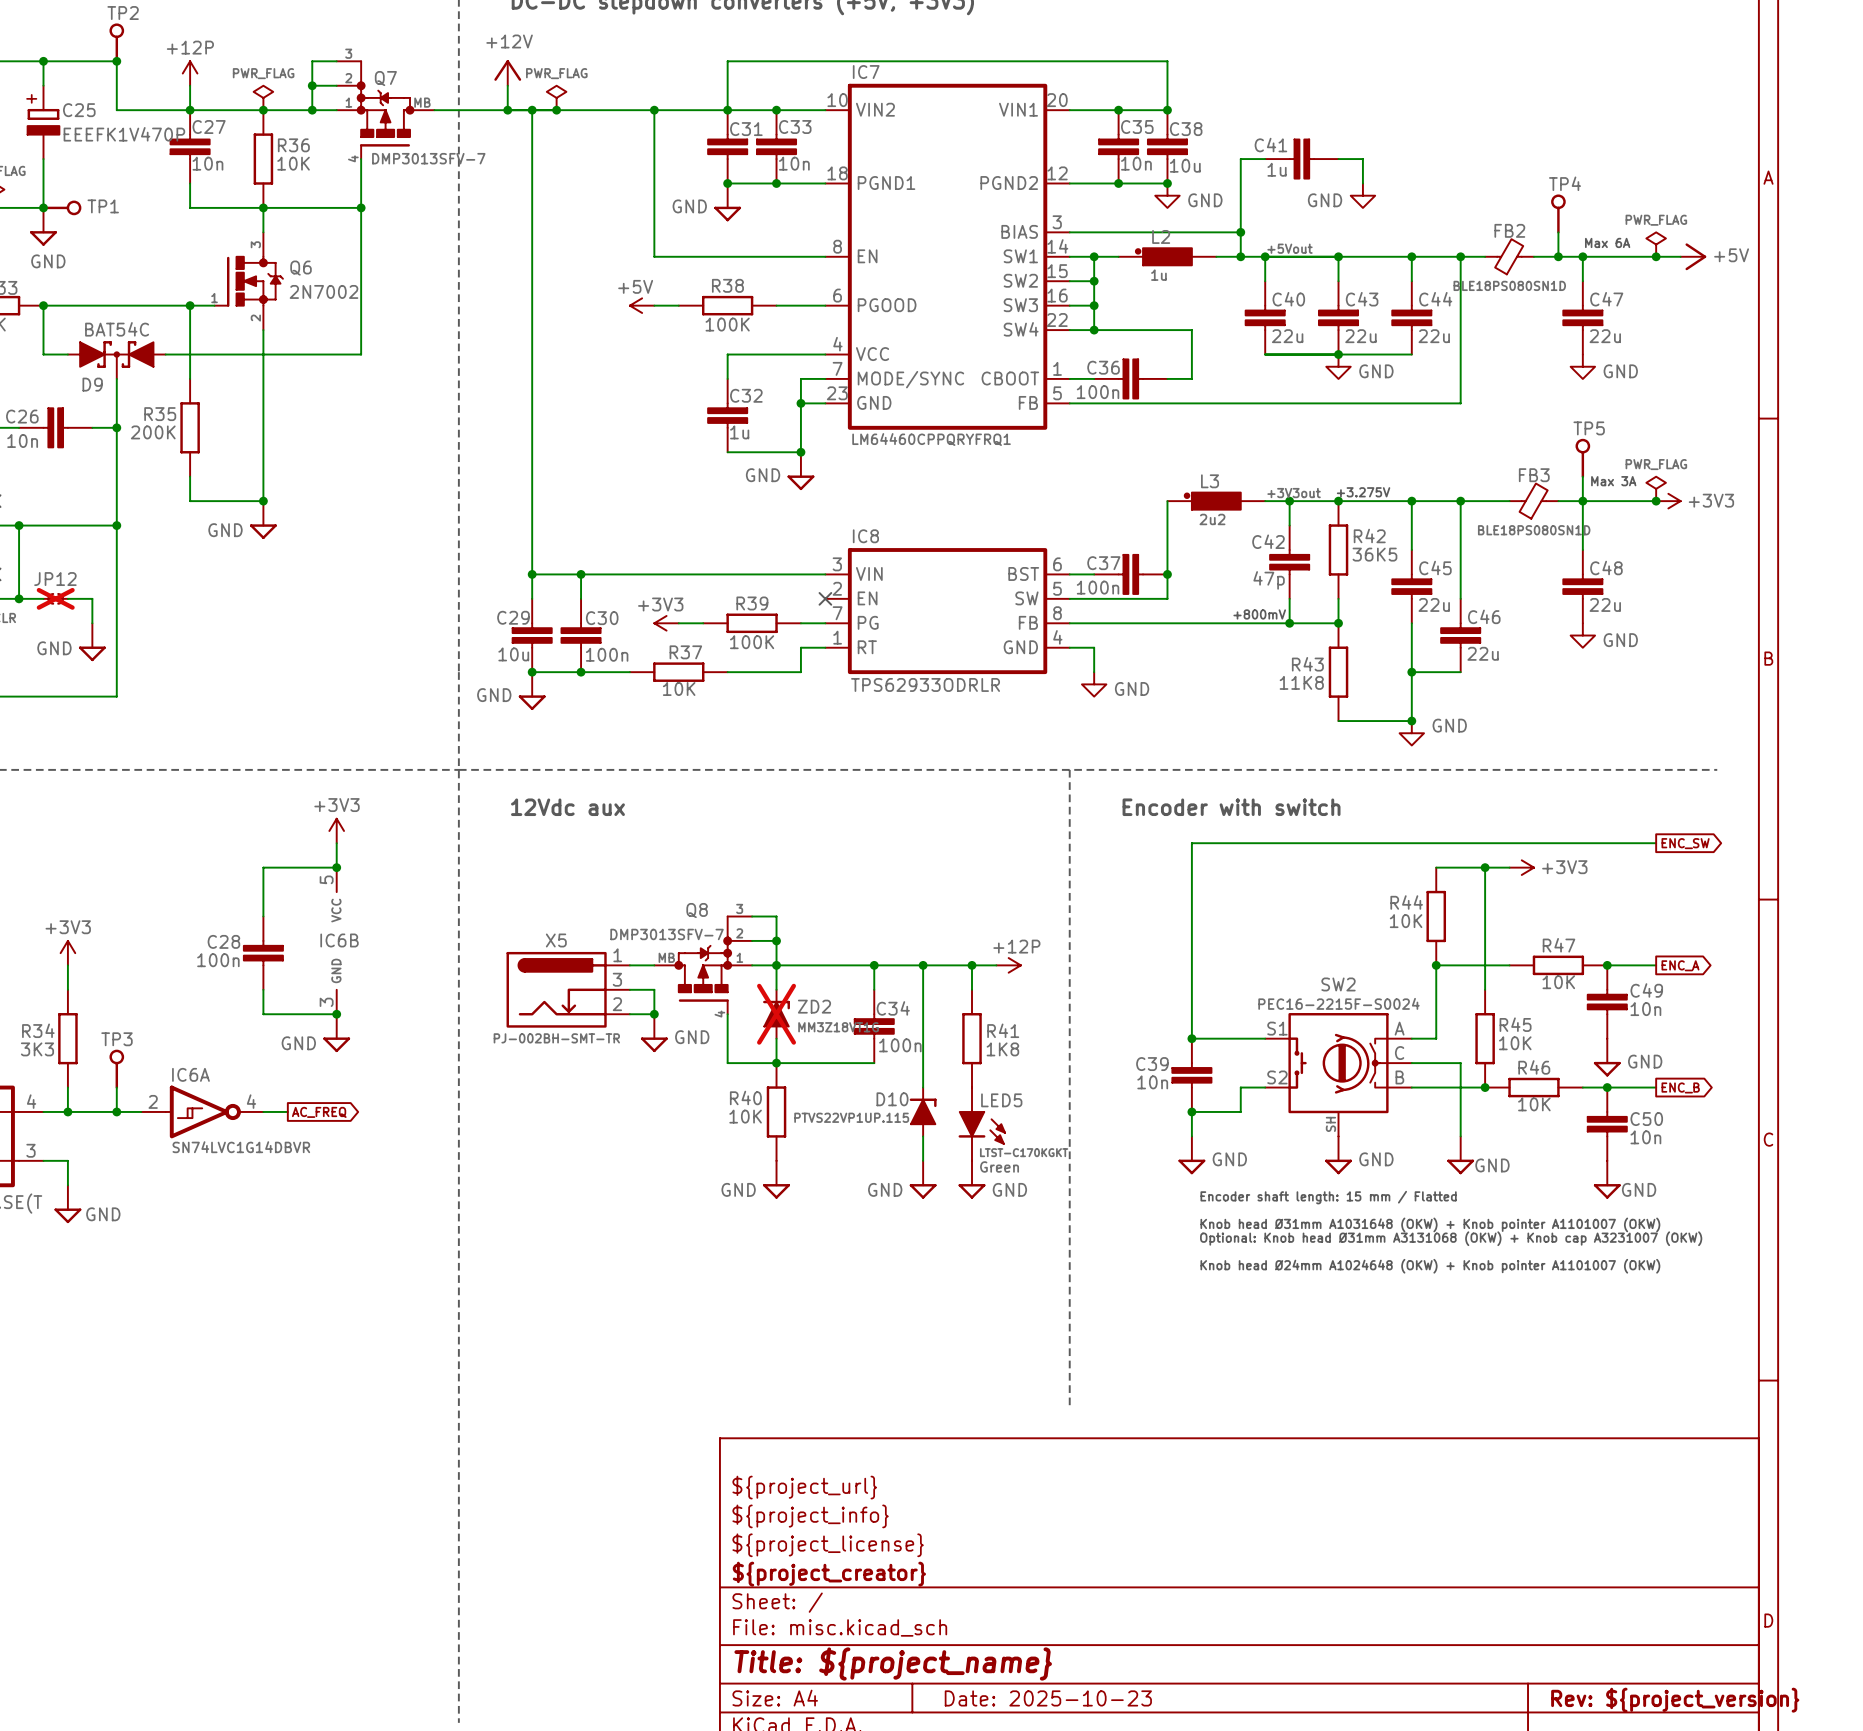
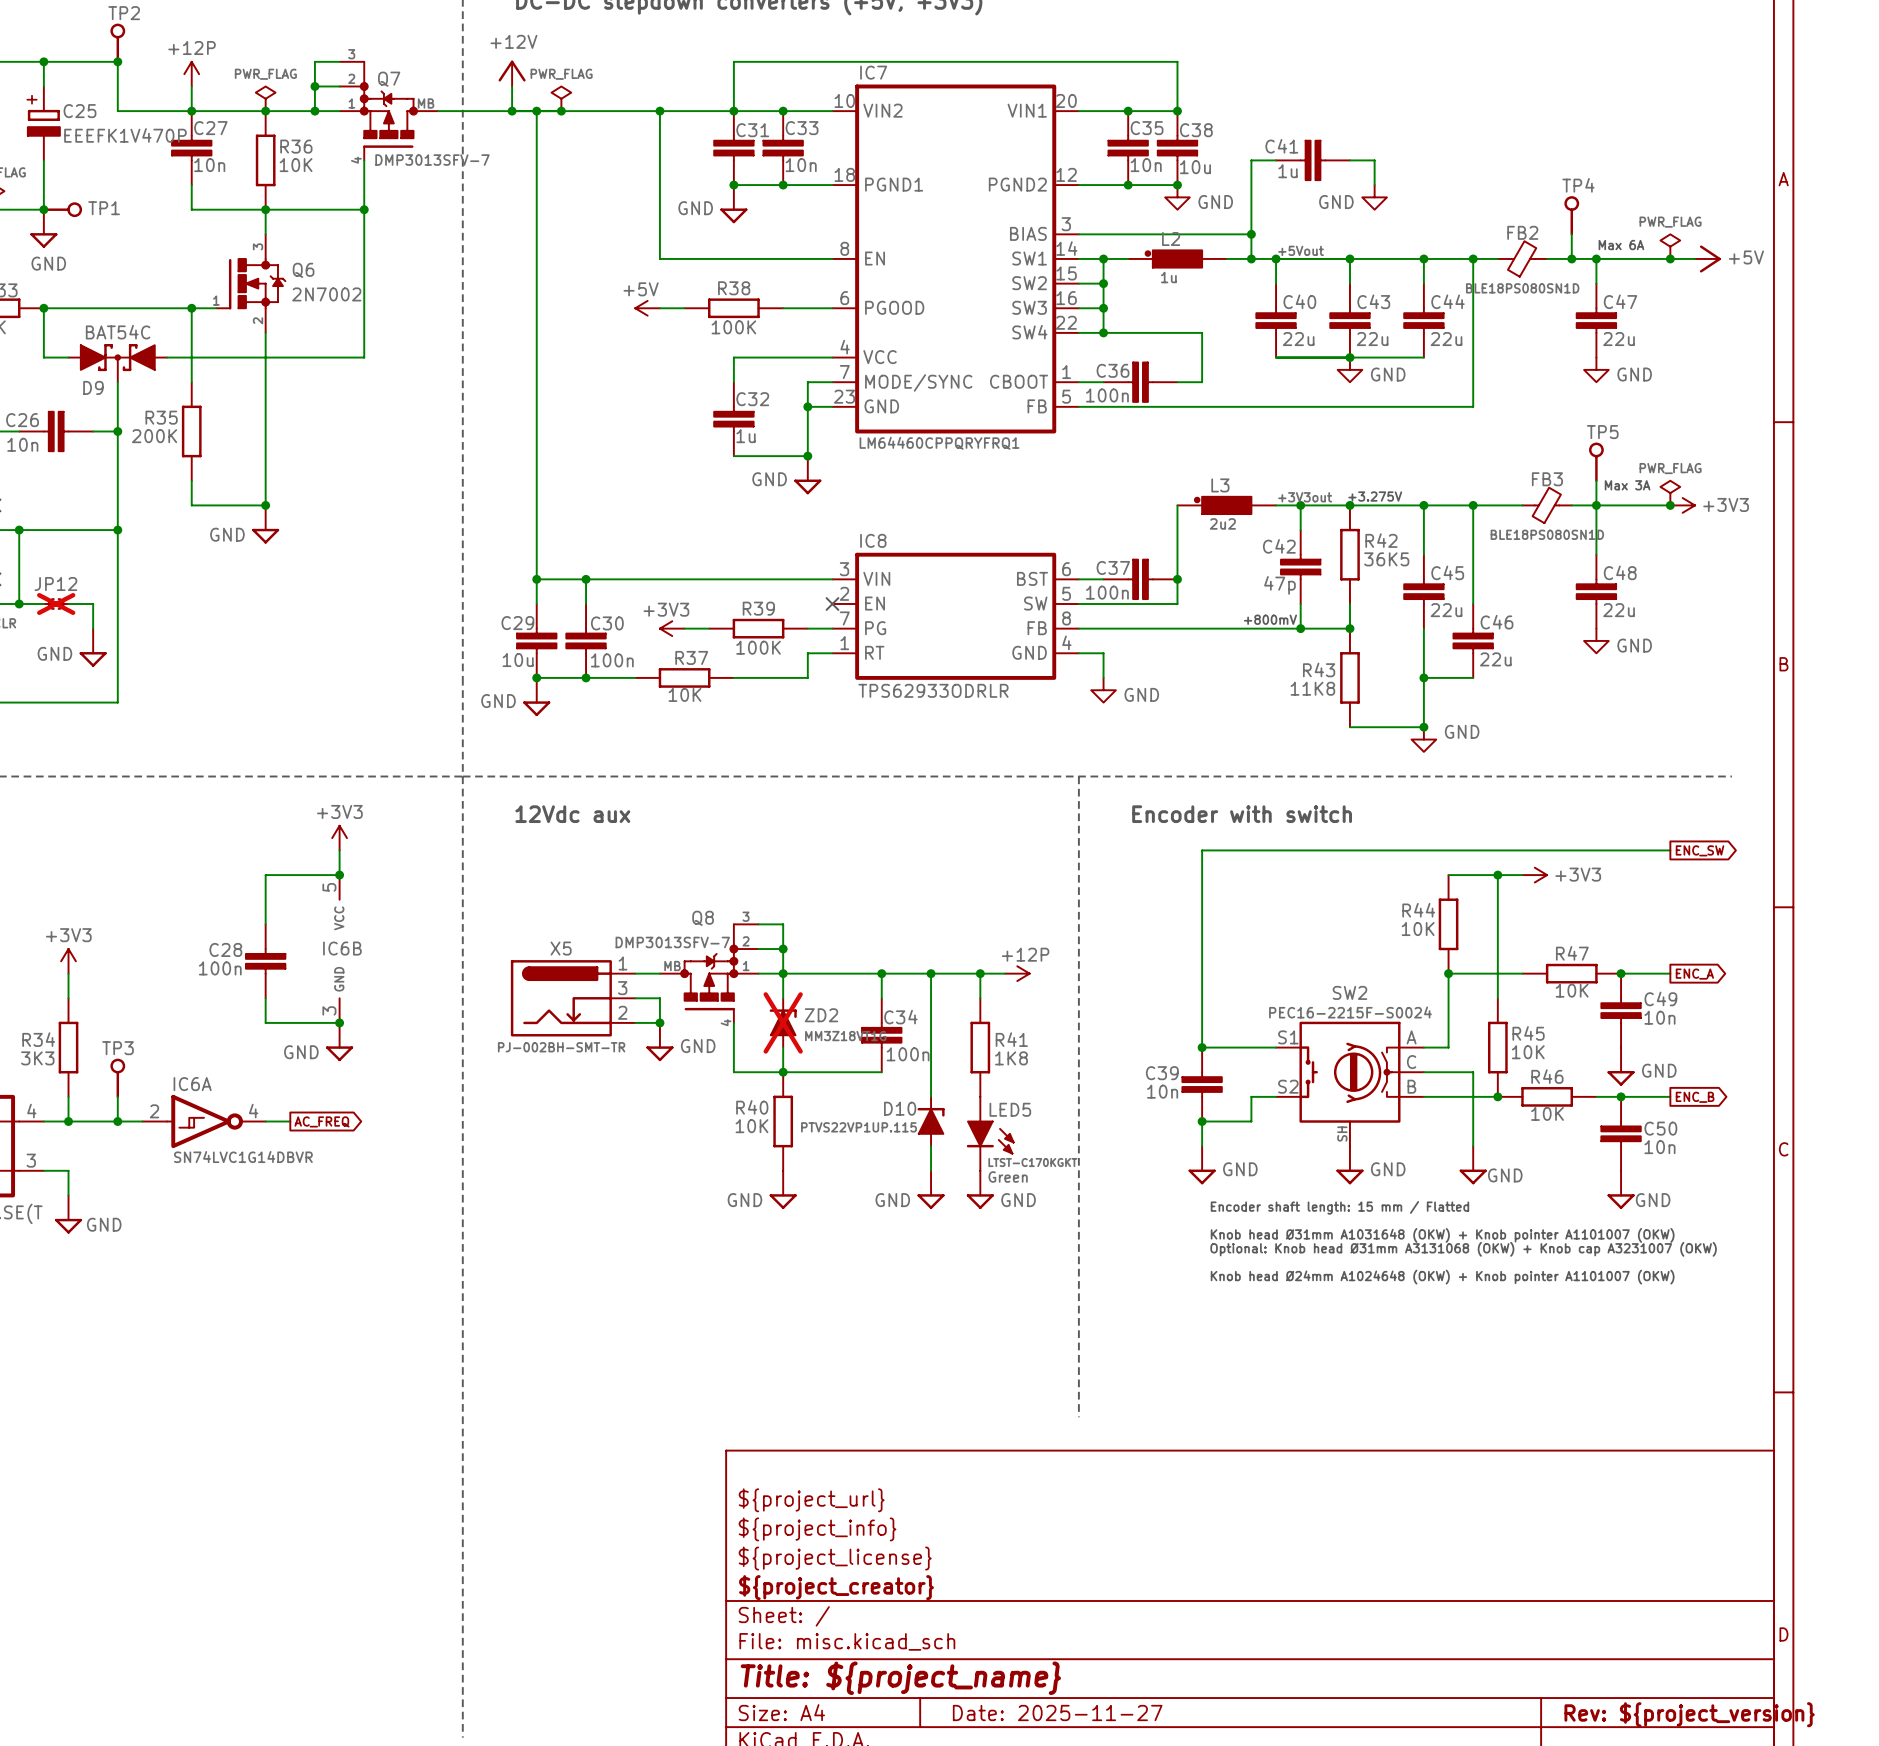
title block: Date: 2025-10-23 (1048, 1698) -> Date: 2025-11-27 (1057, 1712)

